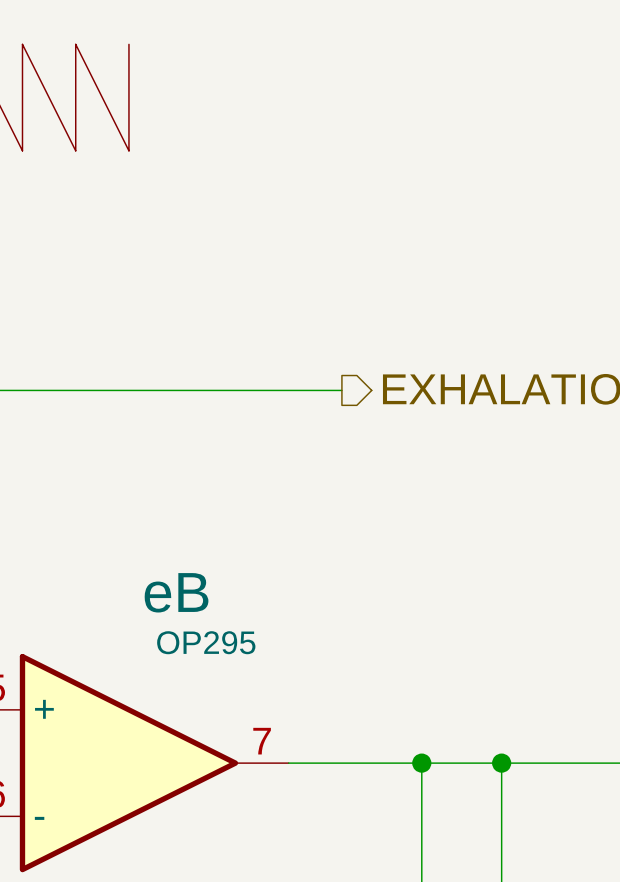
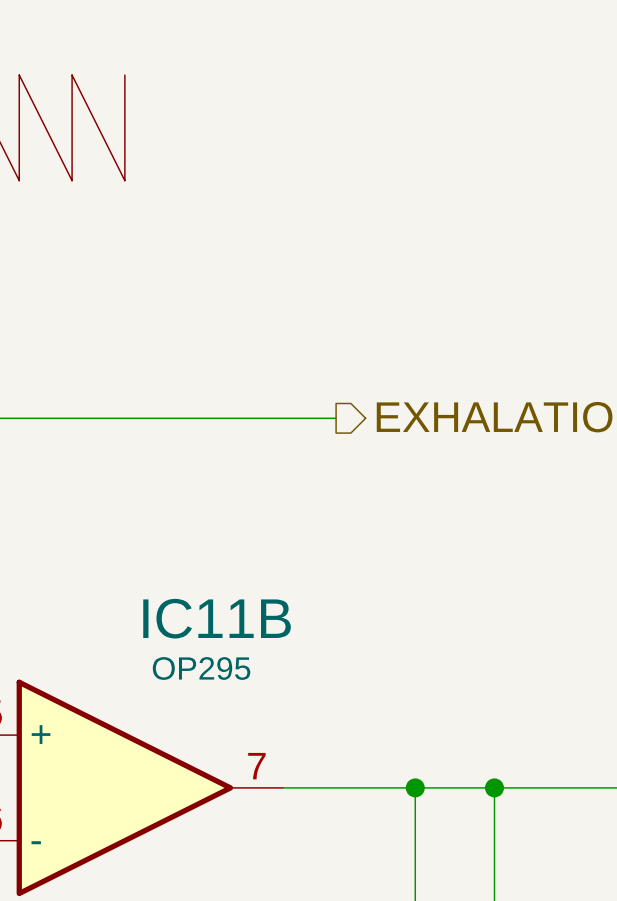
eB name: eB (176, 592) -> IC11B (217, 618)

